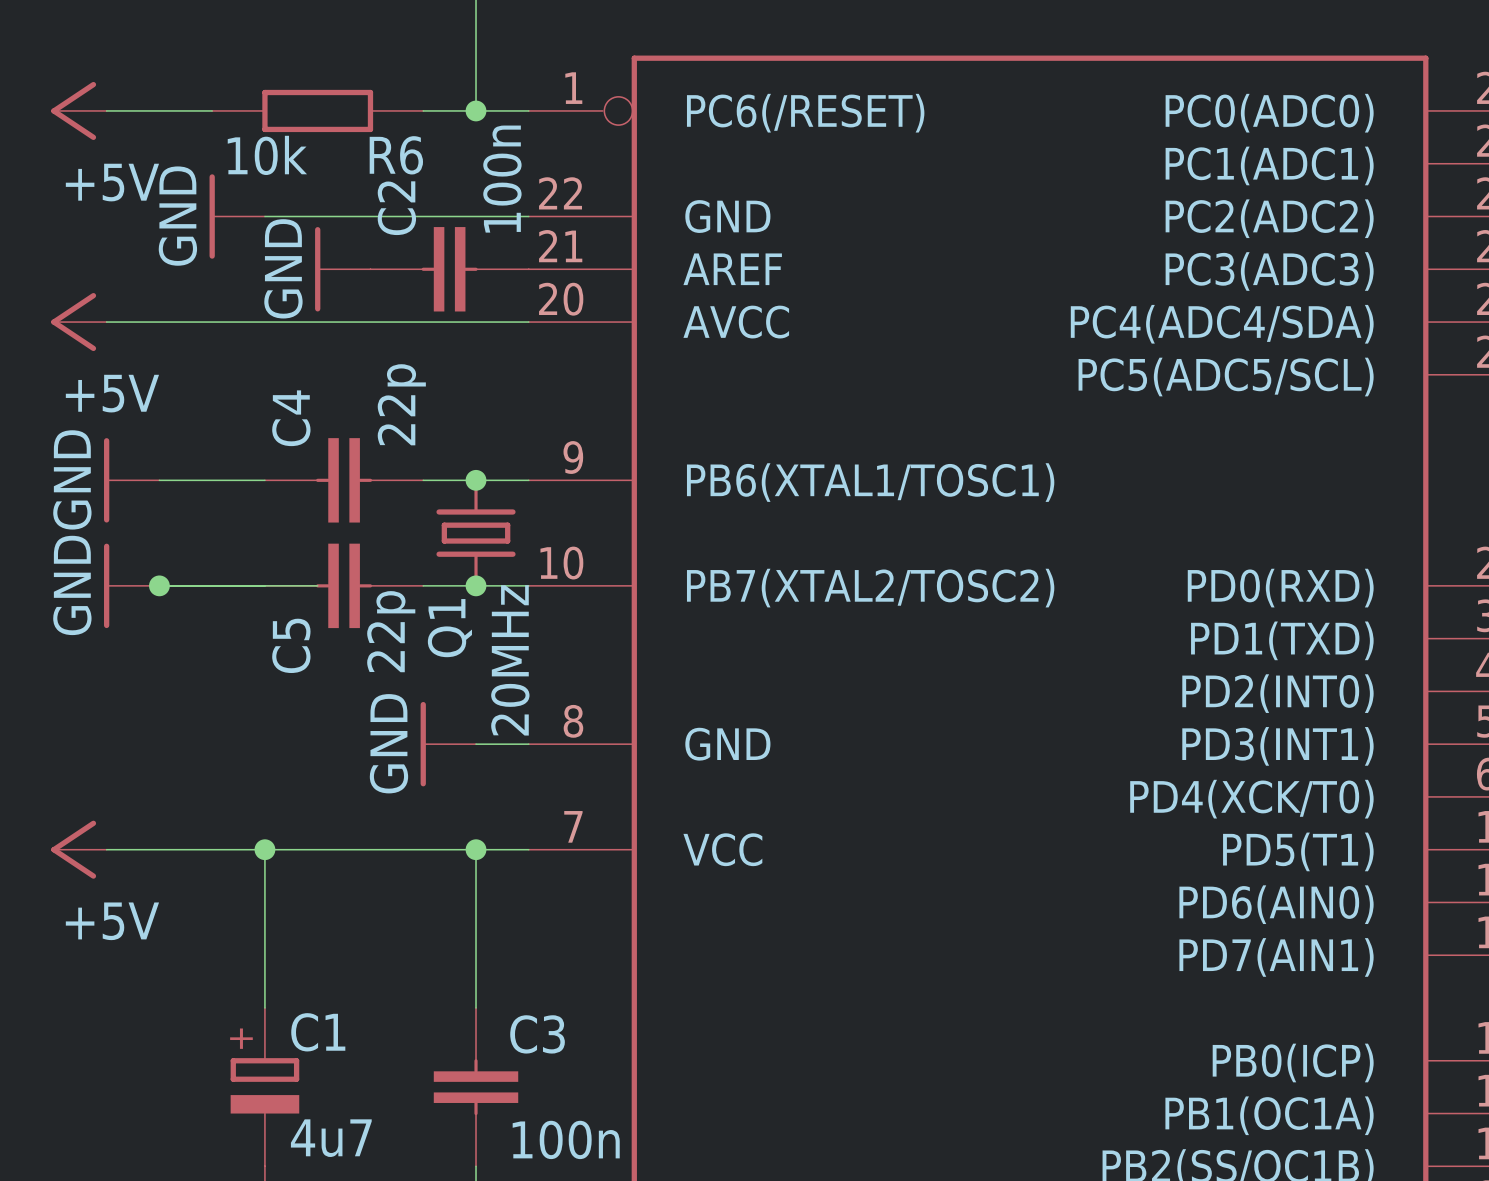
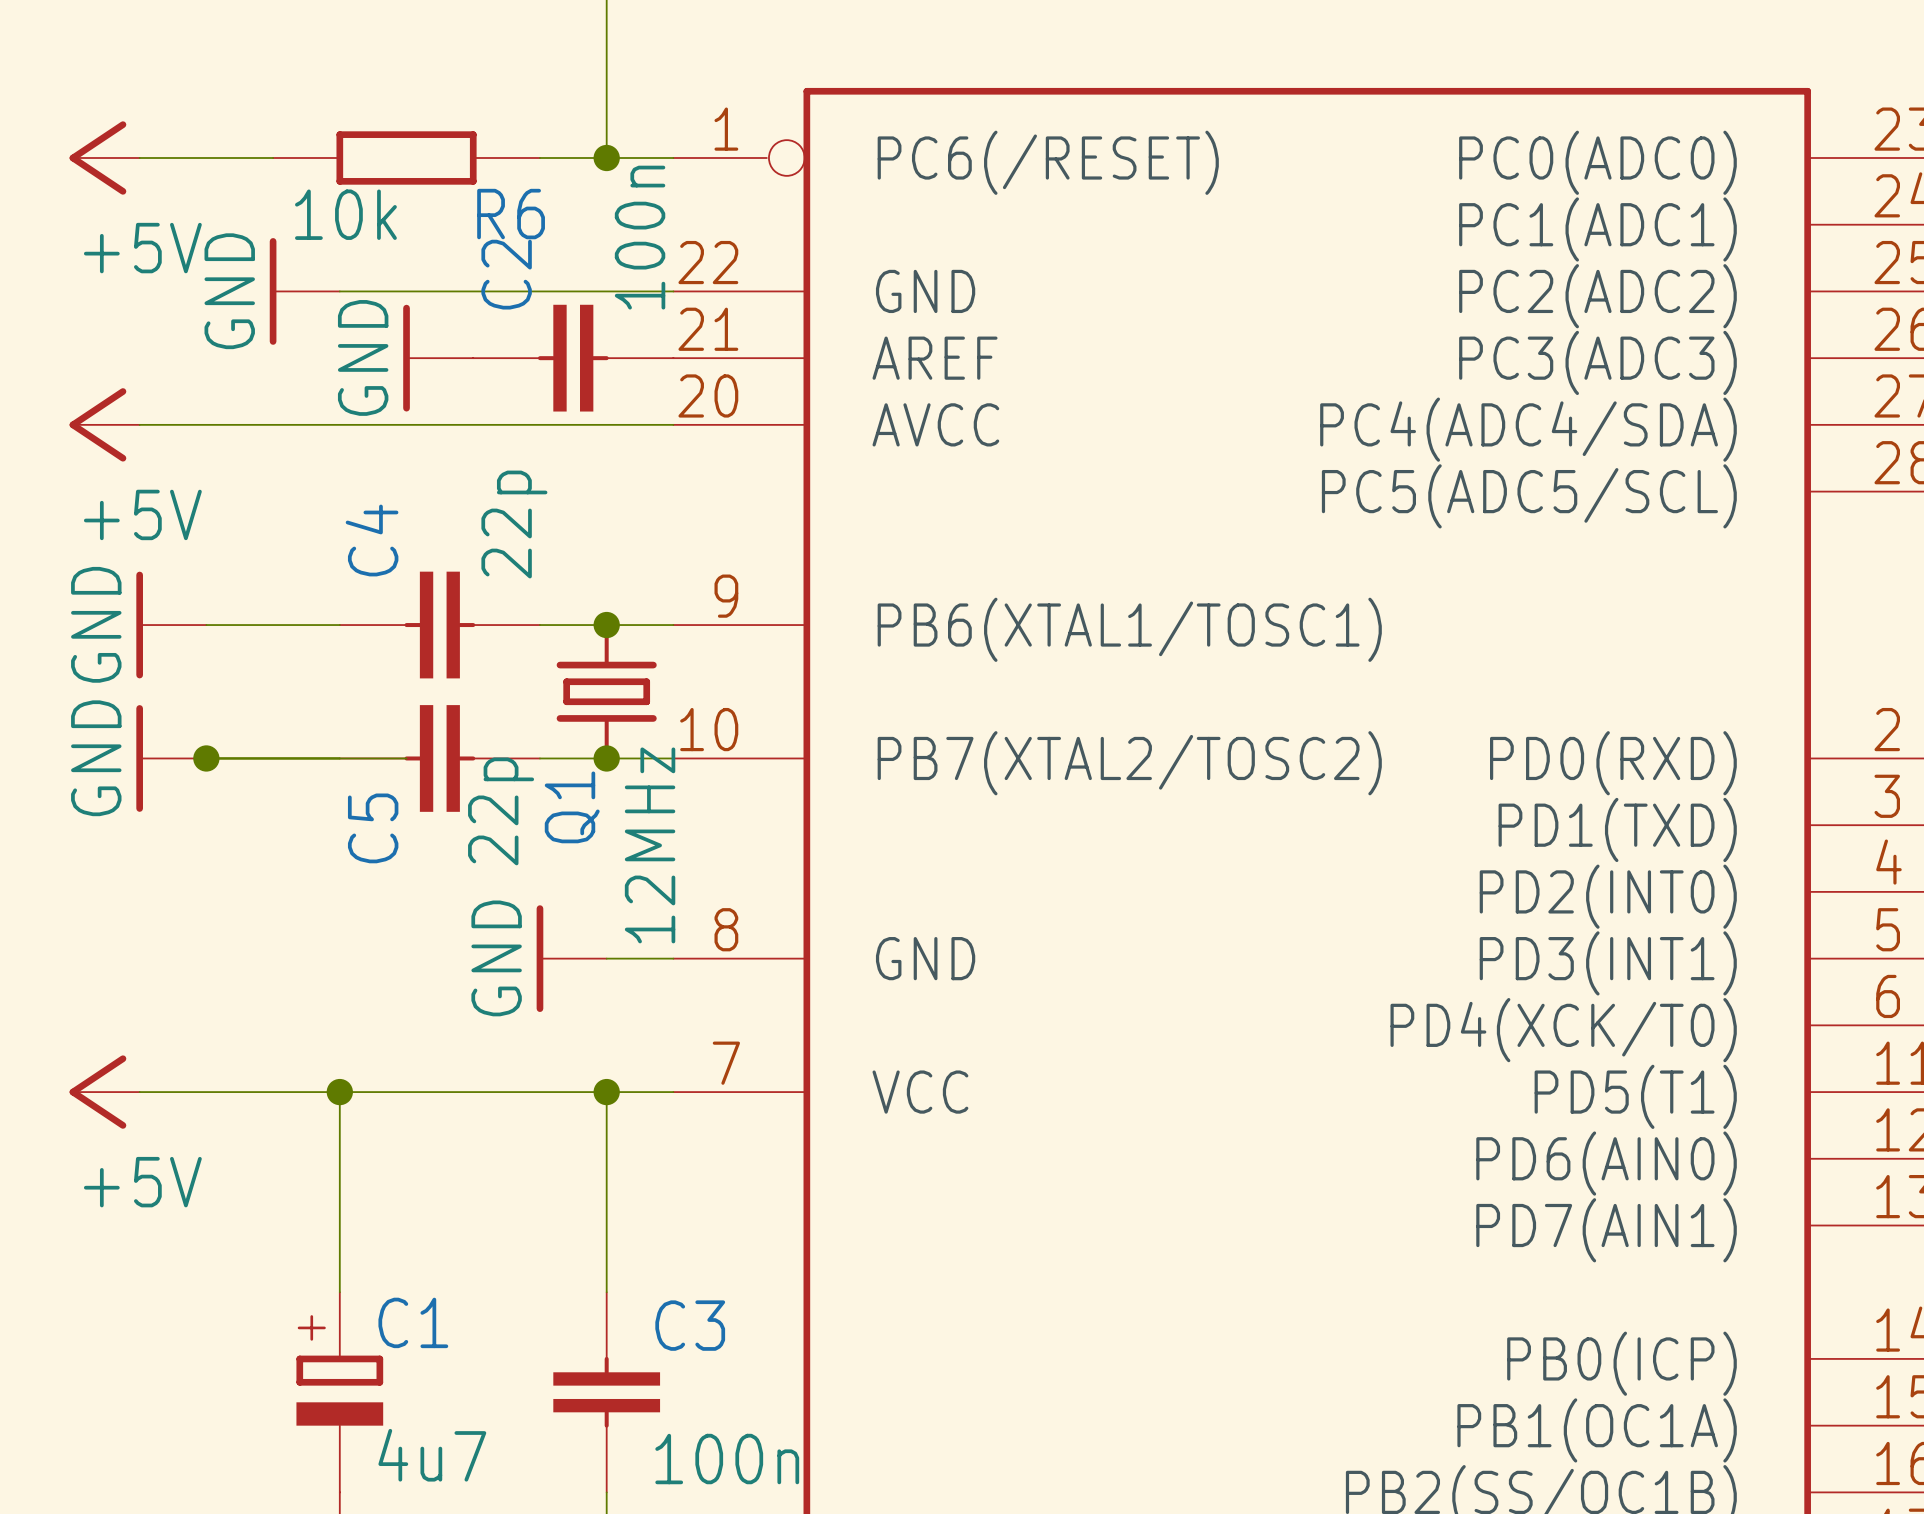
Q1 value: 20MHz (510, 660) -> 12MHz (650, 845)

